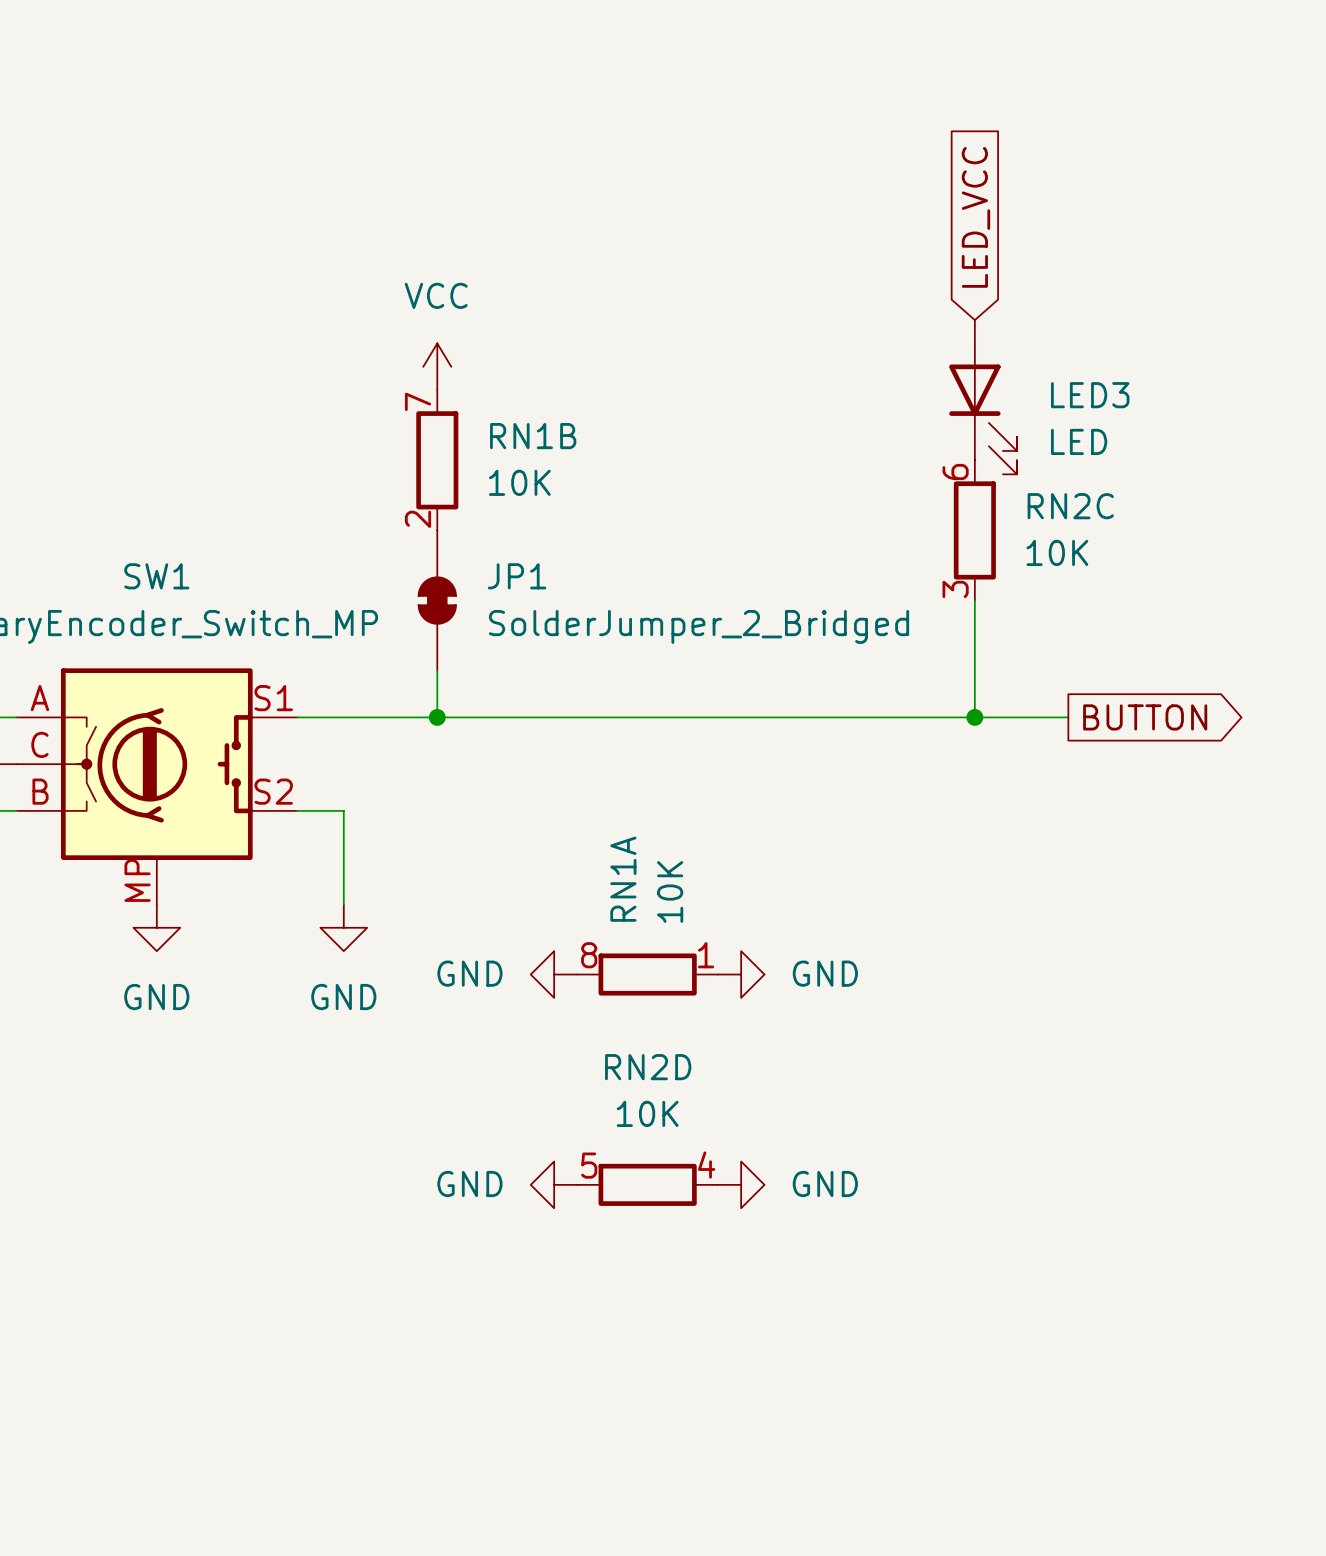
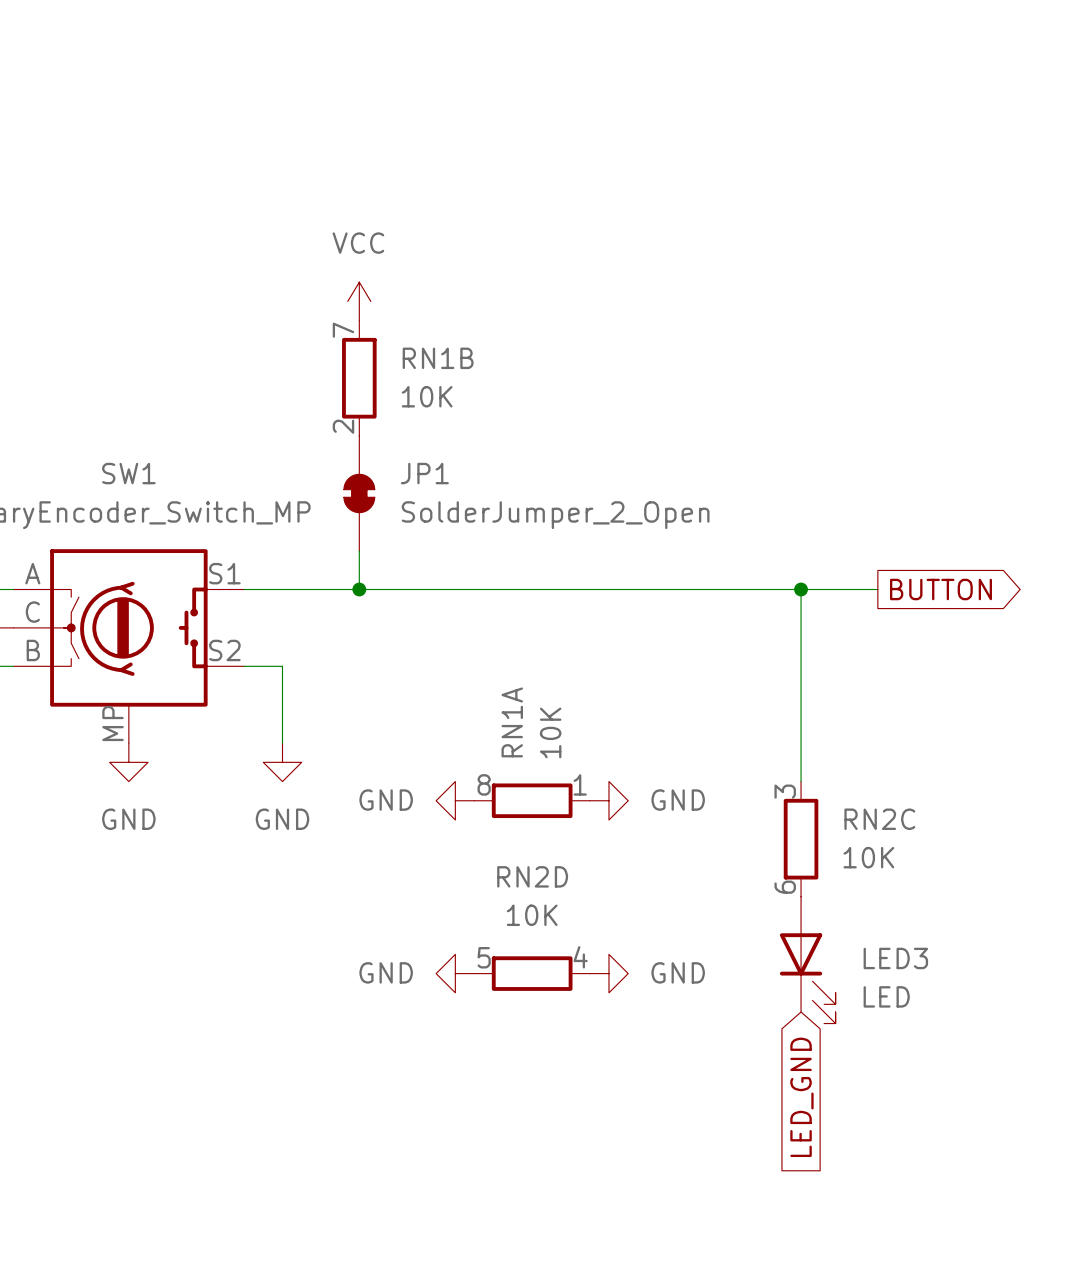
global label: LED_VCC (975, 217) -> none
LED3 position: (983, 397) -> (807, 960)
RN2C rotation: 0° (974, 530) -> 180° (801, 839)
RN2C position: (974, 530) -> (801, 839)
wire: (974, 600) (974, 717) -> (801, 781) (801, 589)
JP1 value: SolderJumper_2_Bridged (699, 626) -> SolderJumper_2_Open (555, 515)
global label: none -> LED_GND (801, 1097)

